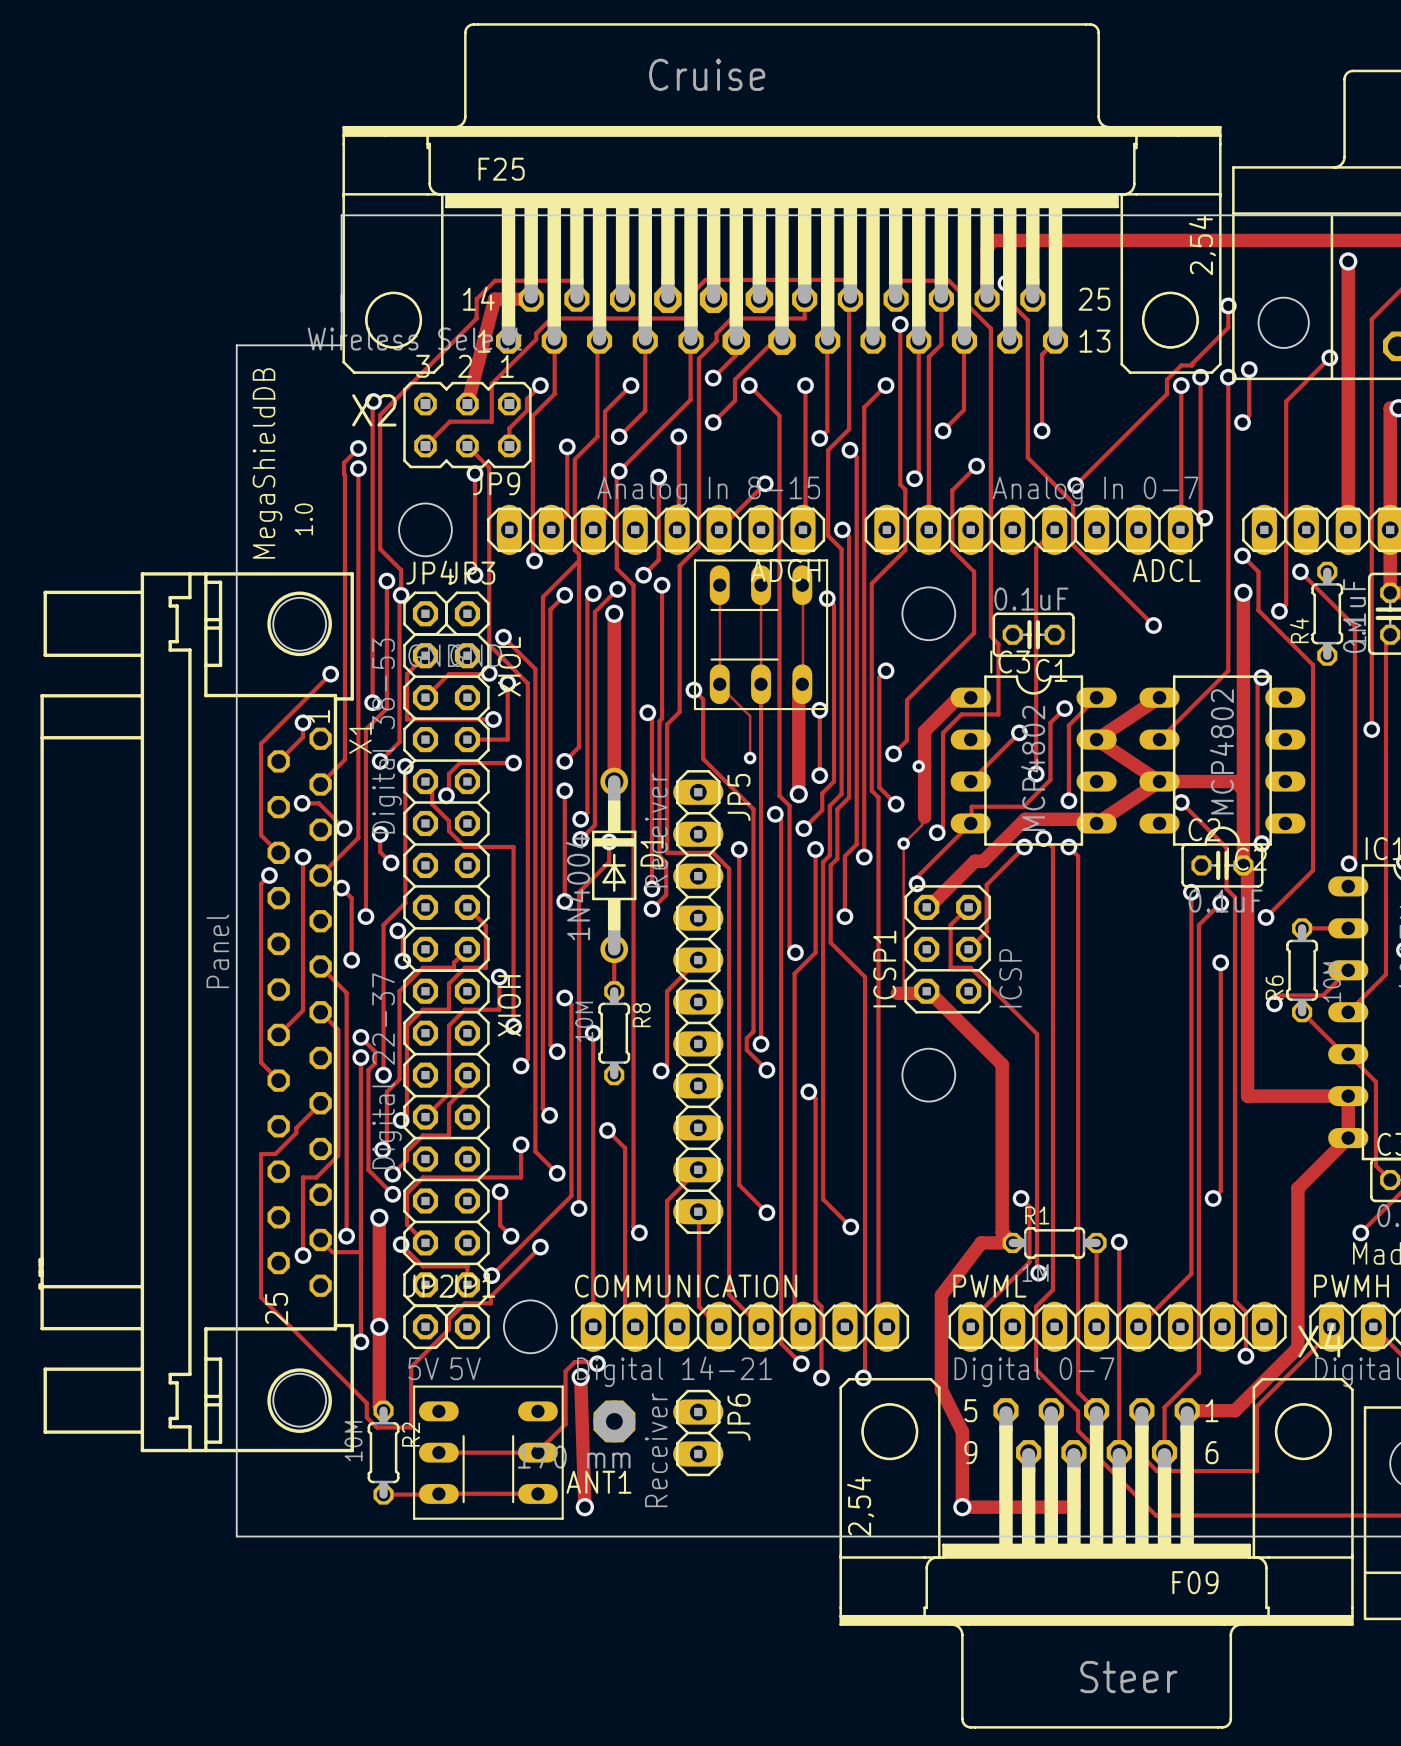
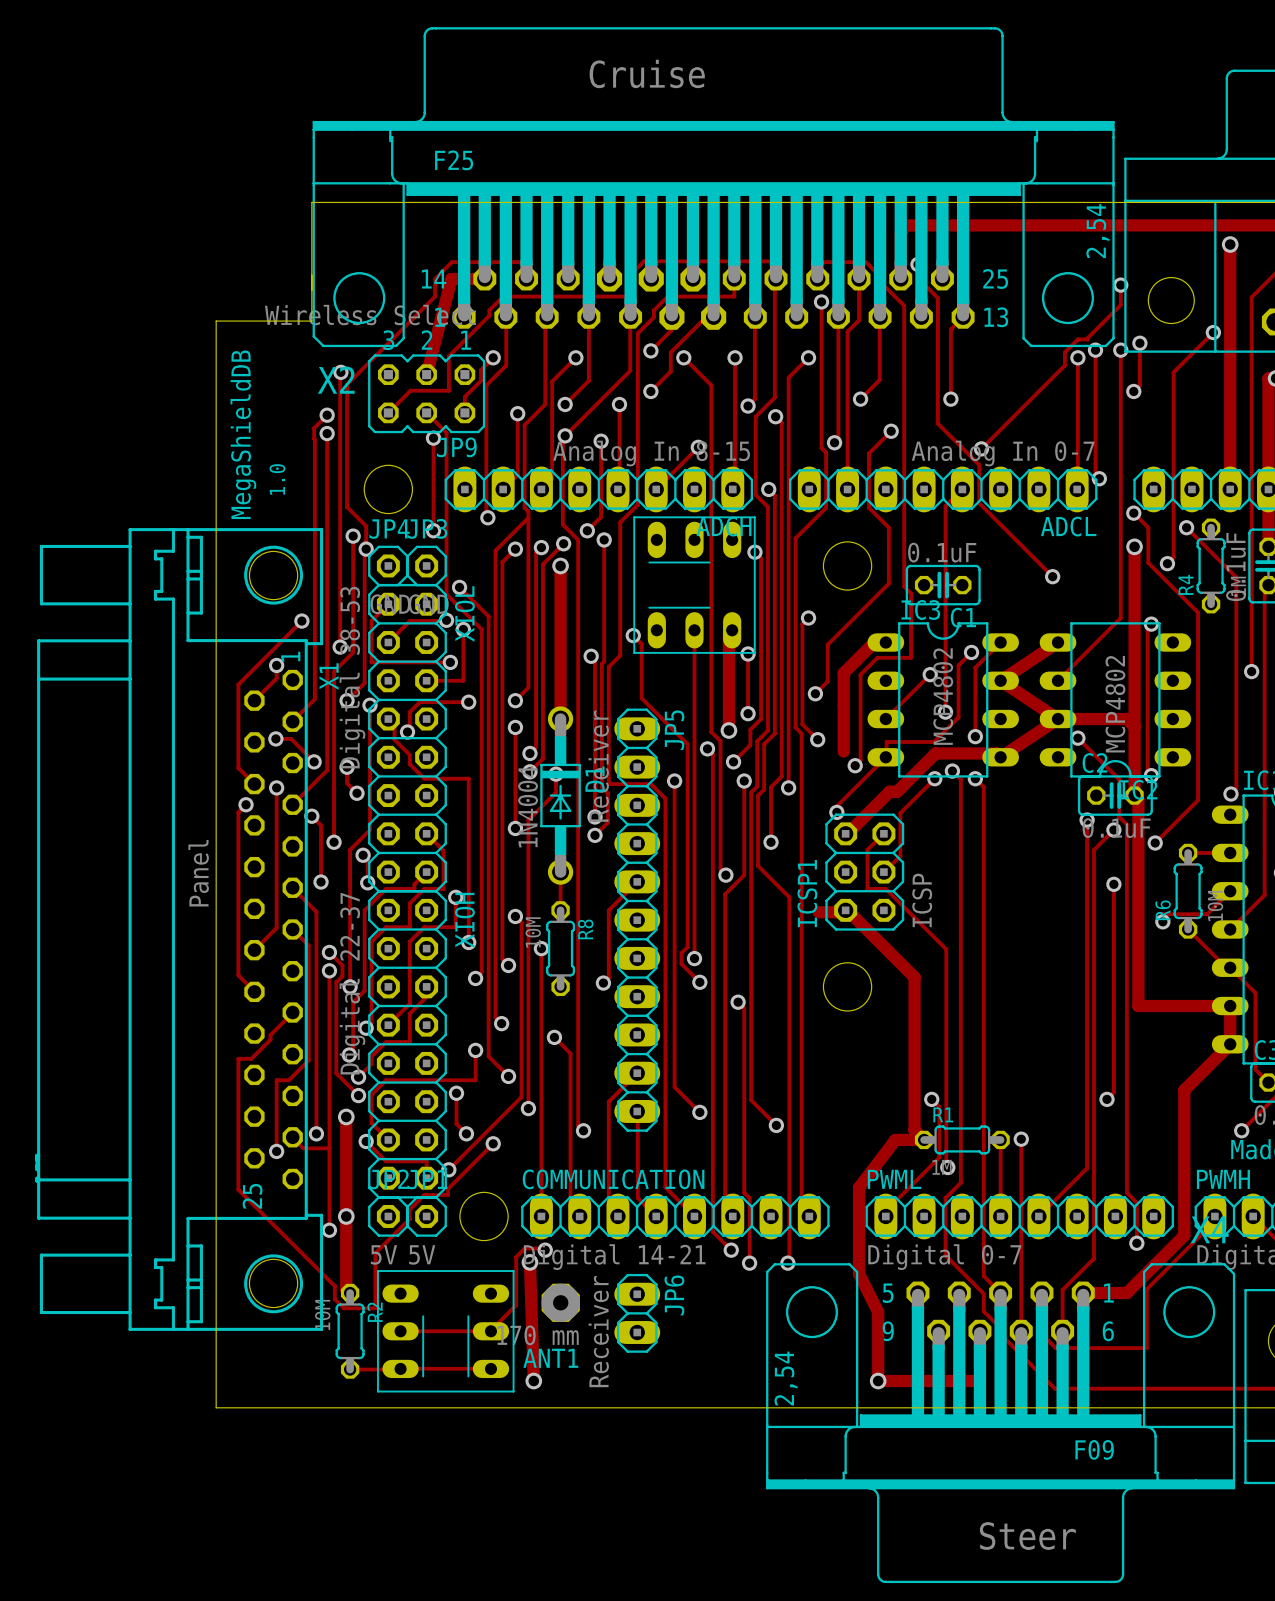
track: (719, 585) (719, 684) (750, 716) (750, 758) -> none
track: (761, 585) (761, 684) -> none
track: (802, 585) (802, 684) -> none
via: (750, 758) -> none
via: (918, 766) -> none
track: (924, 817) (922, 825) (903, 843) (903, 993) -> none
via: (903, 843) -> none

